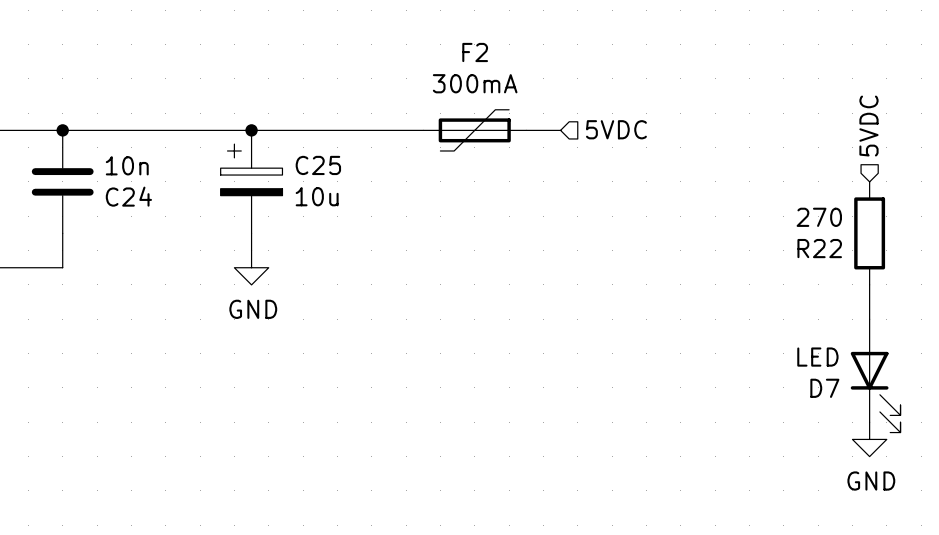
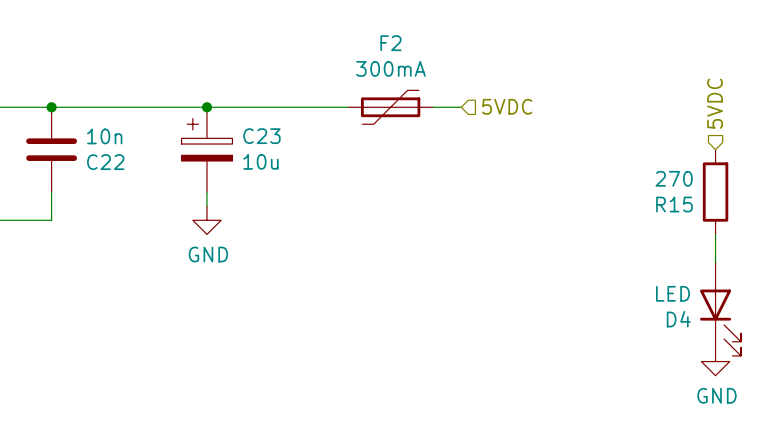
C25 name: C25 (318, 165) -> C23 (261, 136)
C24 name: C24 (128, 196) -> C22 (105, 162)
R22 name: R22 (819, 248) -> R15 (674, 204)
D7 name: D7 (824, 388) -> D4 (678, 319)

